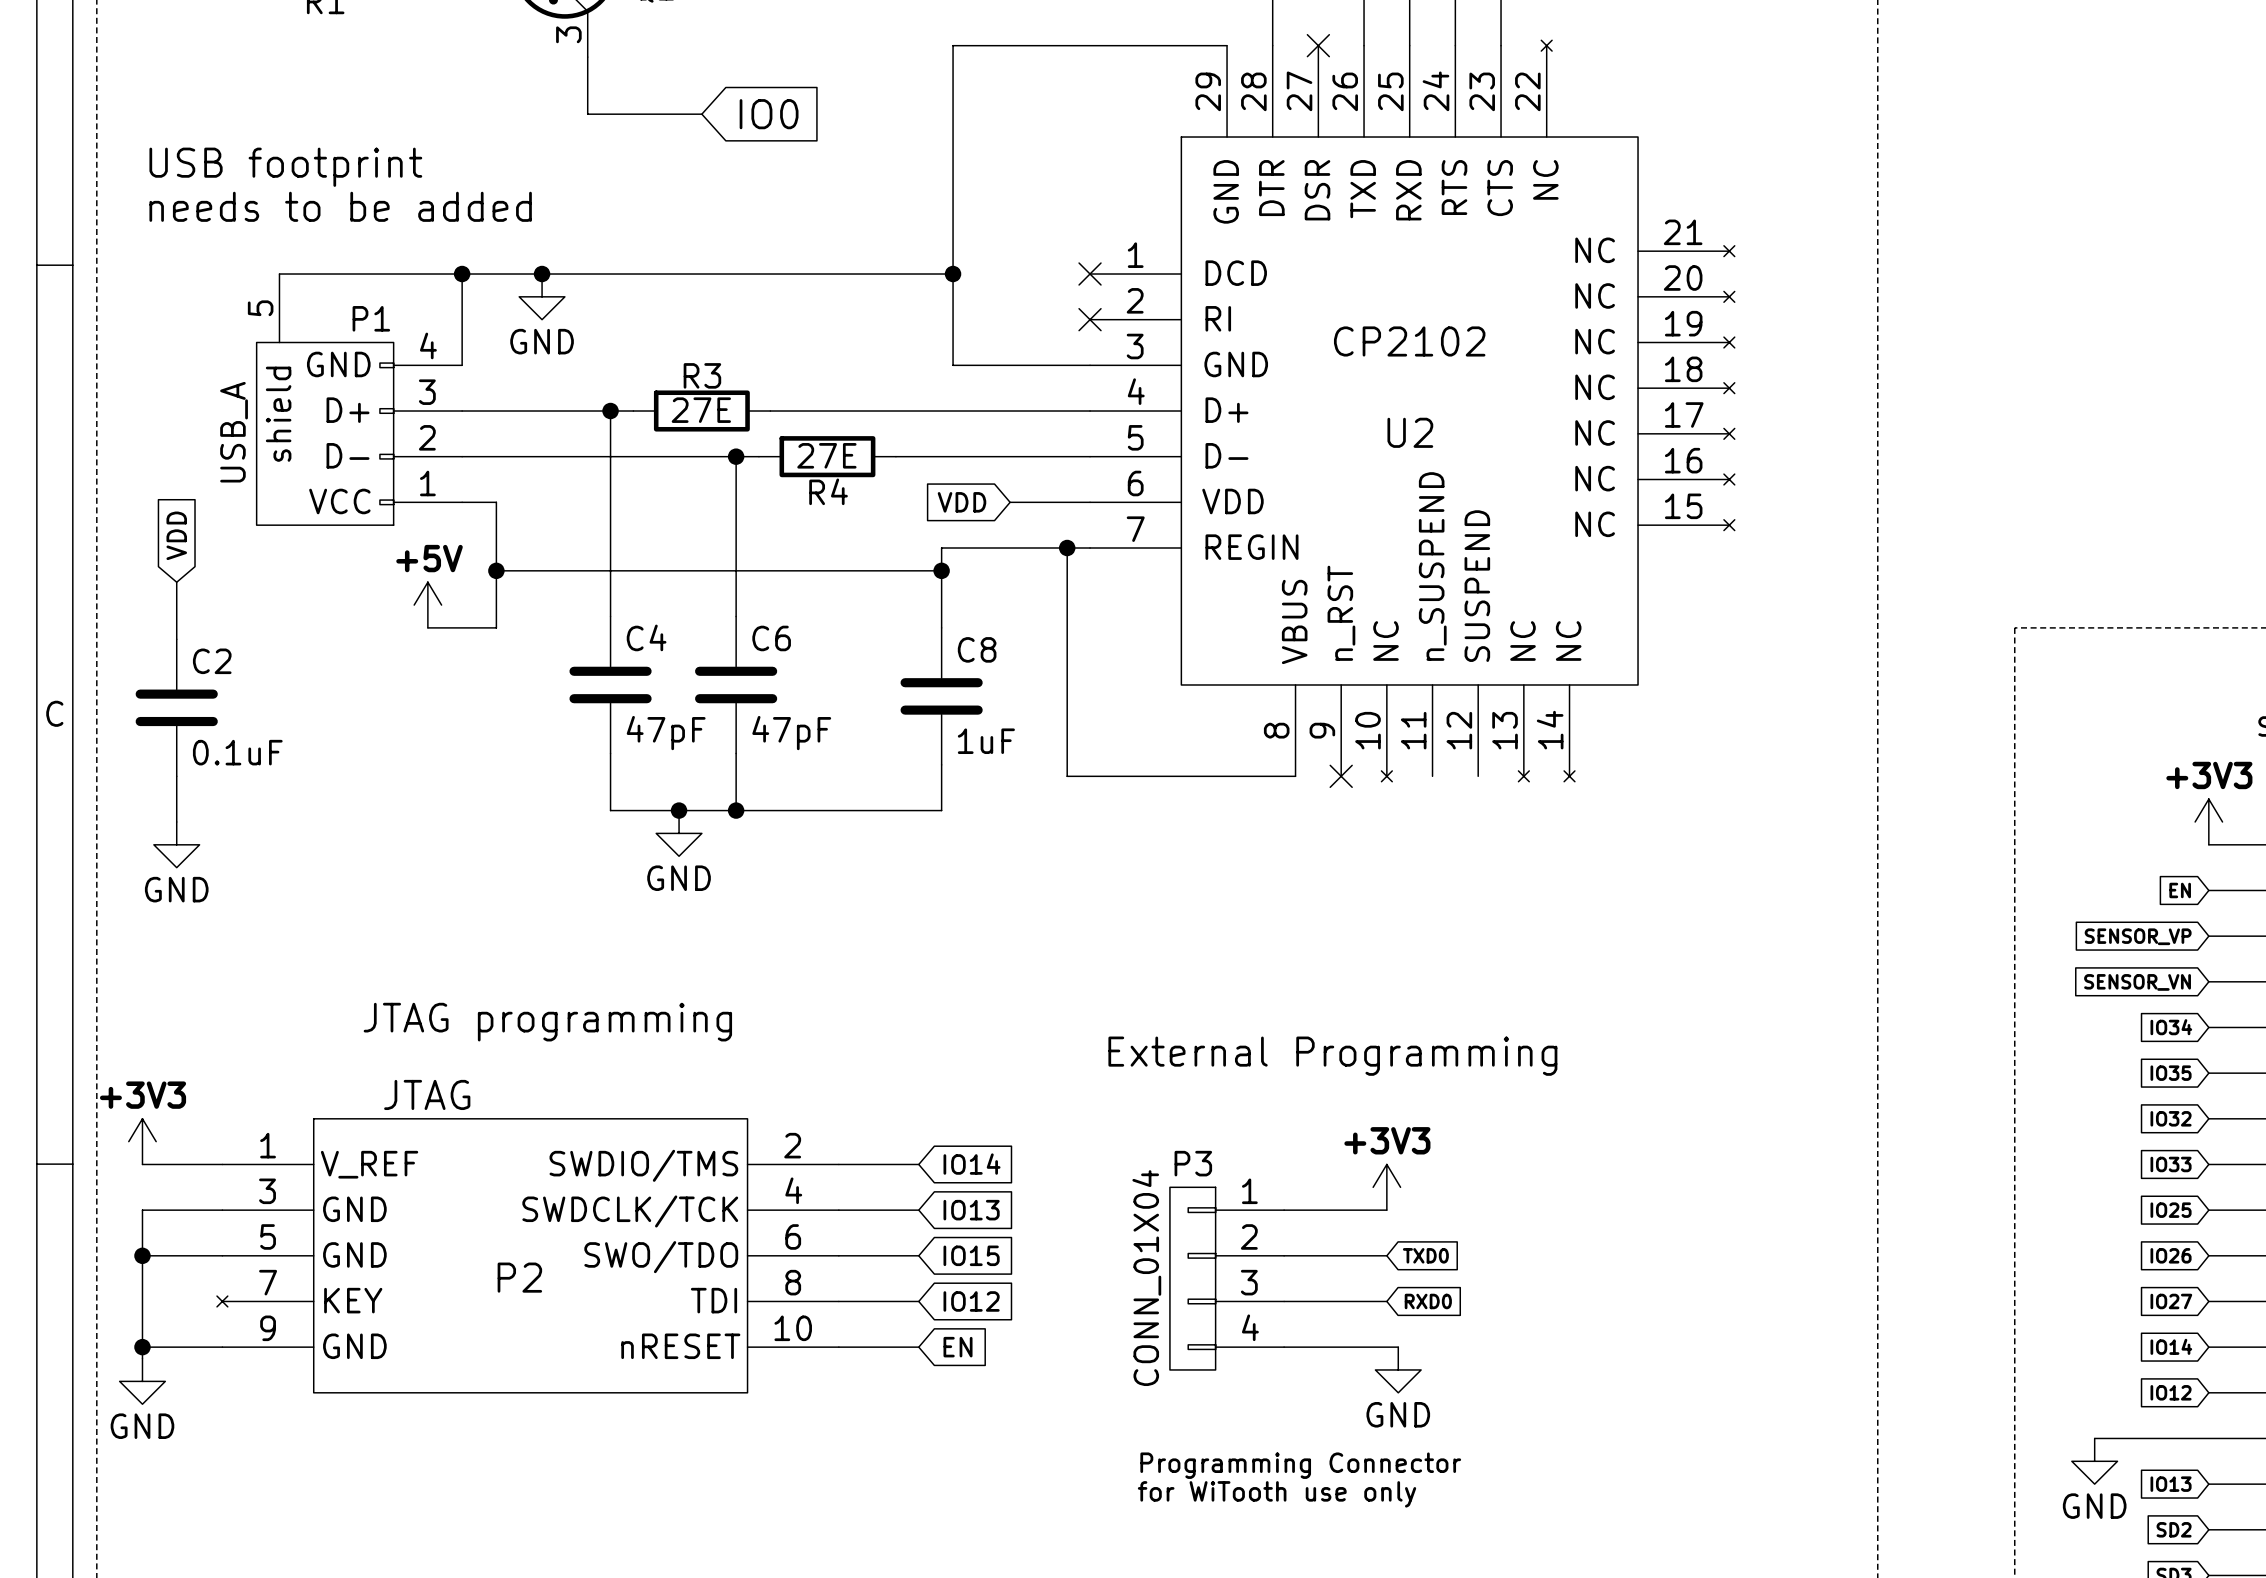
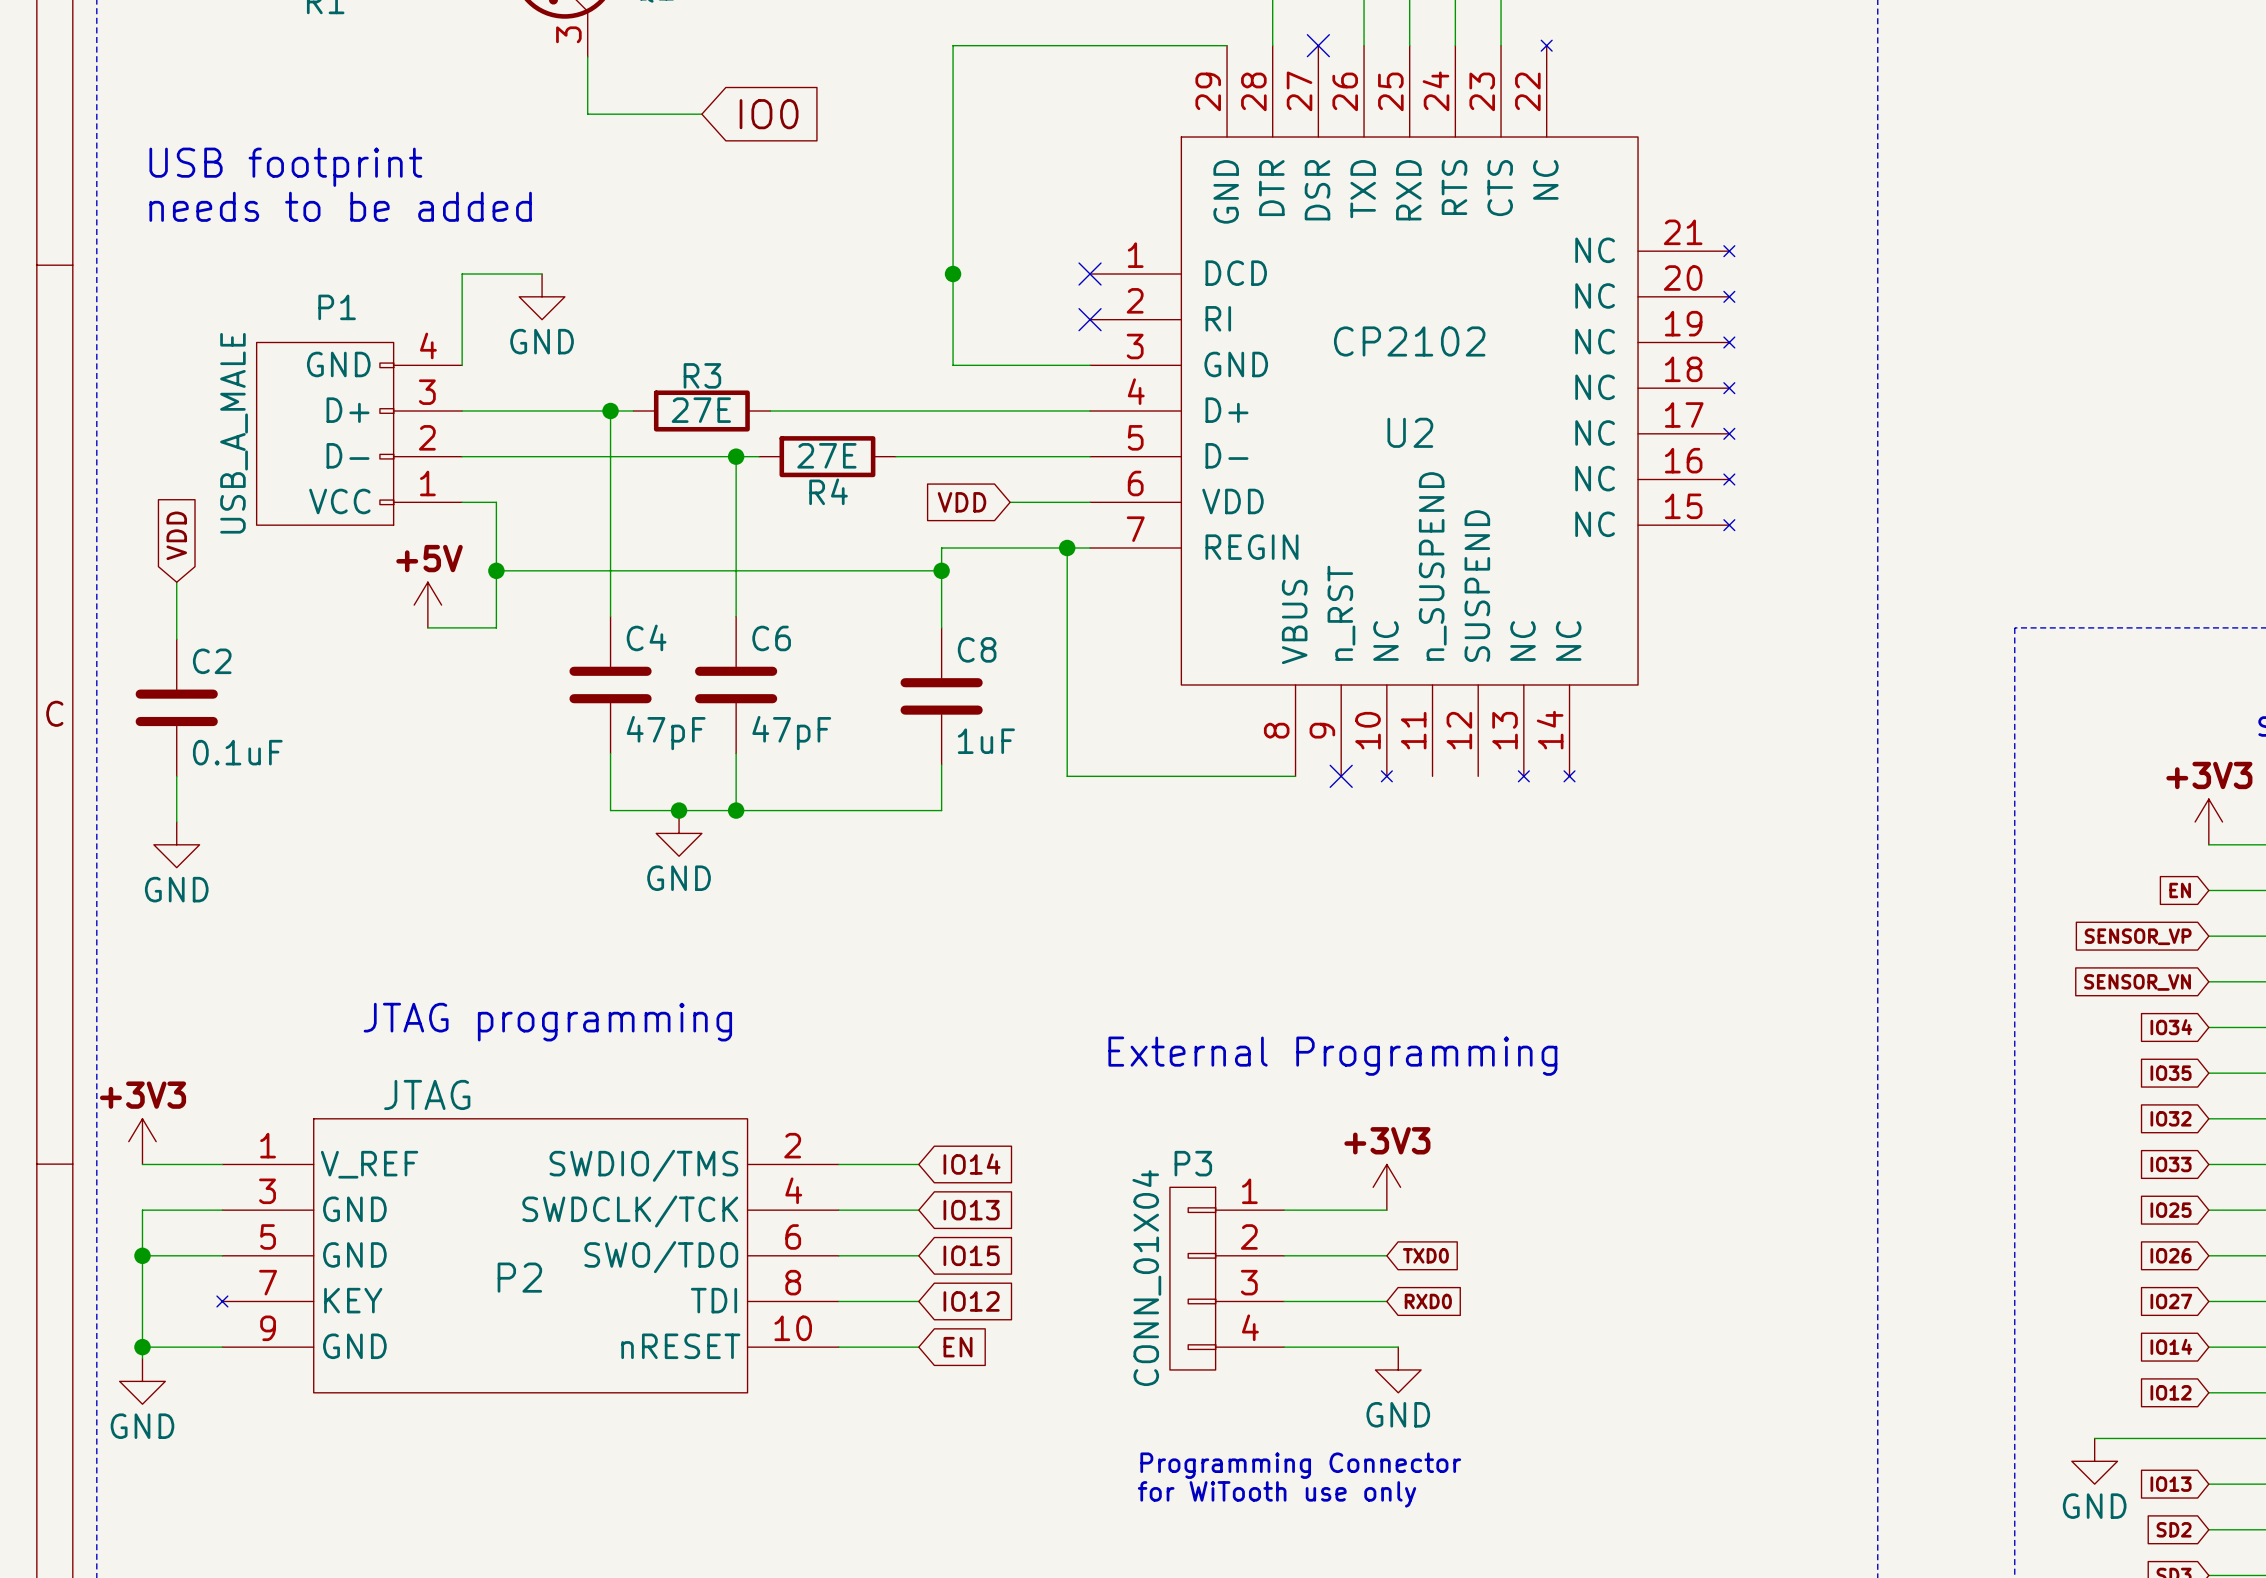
P1 symbol: [256, 274, 463, 526] -> [256, 342, 463, 526]
wire: (279, 274) (462, 274) -> none
junction: (462, 274) -> none
wire: (542, 274) (953, 274) -> none
junction: (542, 274) -> none
P1 name position: P1 (371, 318) -> P1 (337, 307)
P1 value: USB_A (234, 432) -> USB_A_MALE (234, 433)

